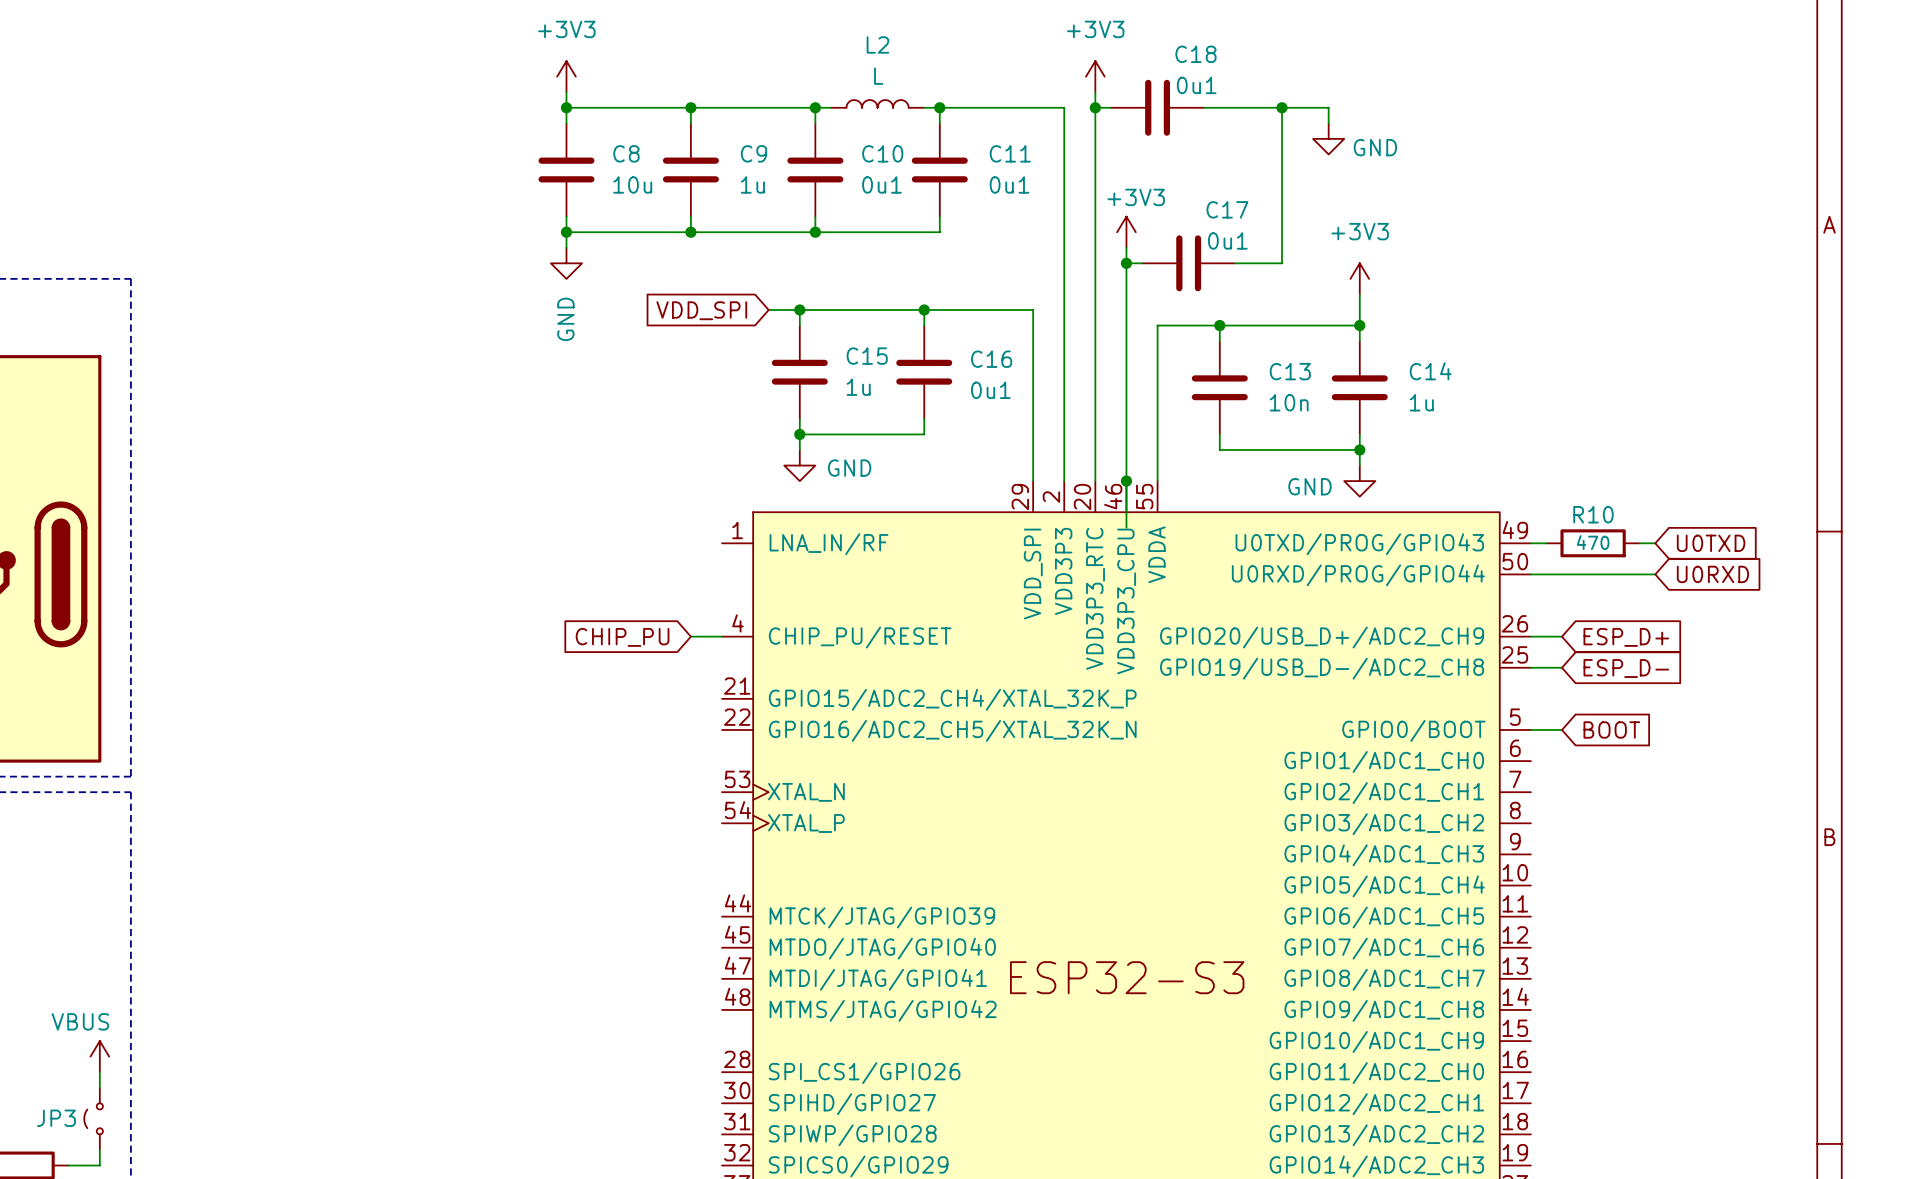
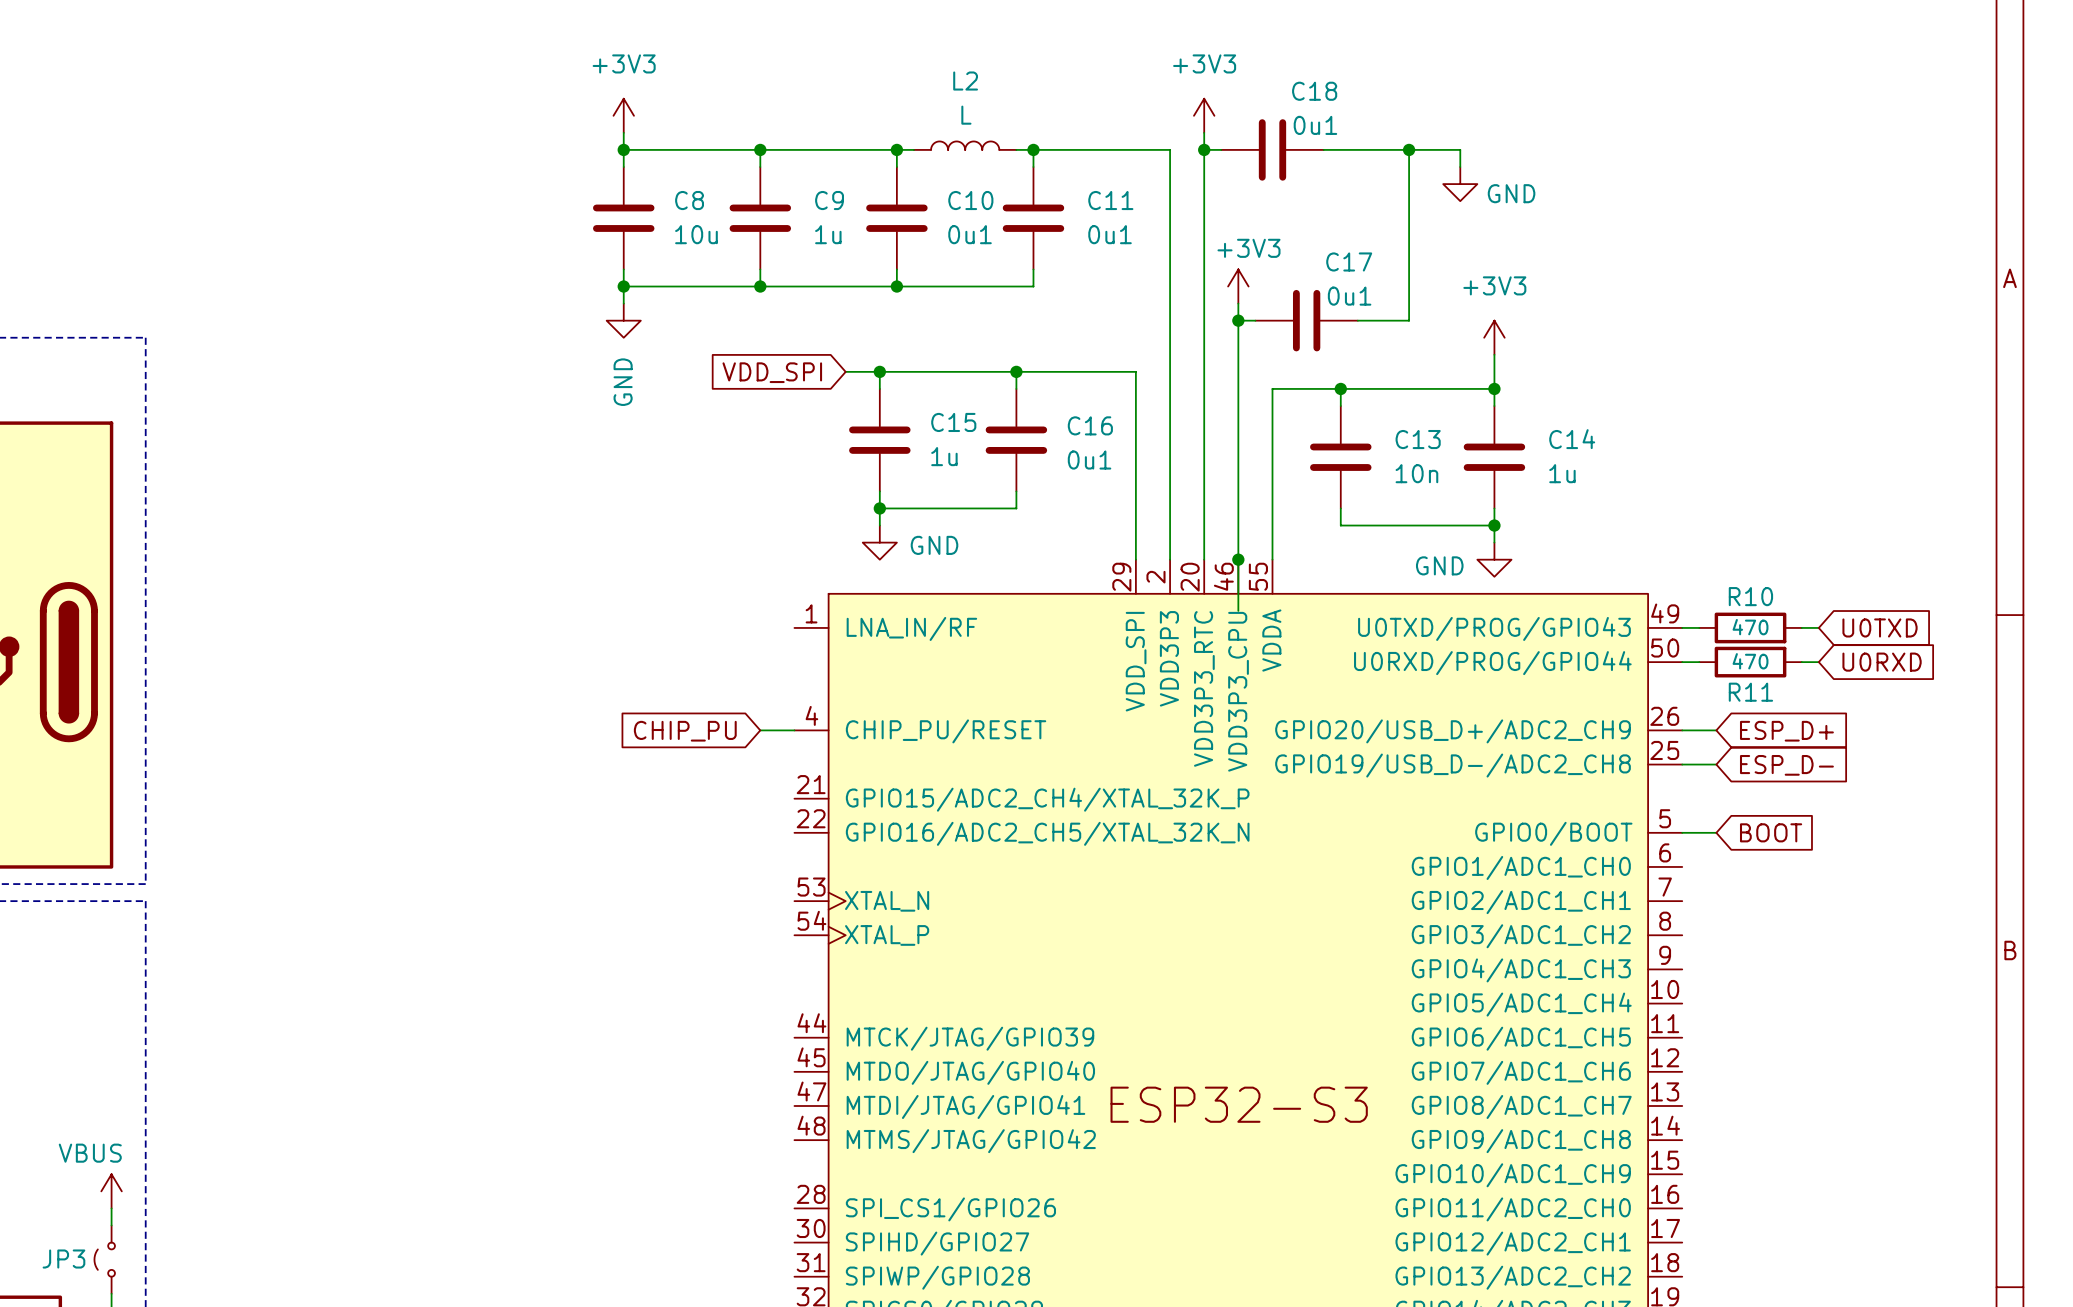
wire: (1546, 574) (1639, 574) -> none
R11: none -> 470 (1750, 662)

